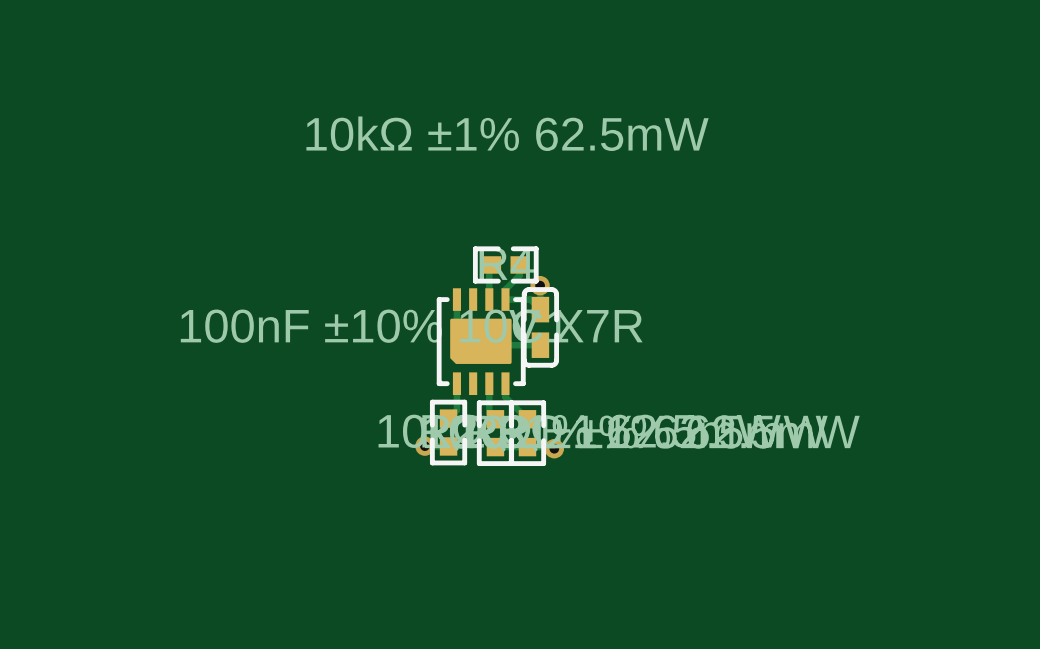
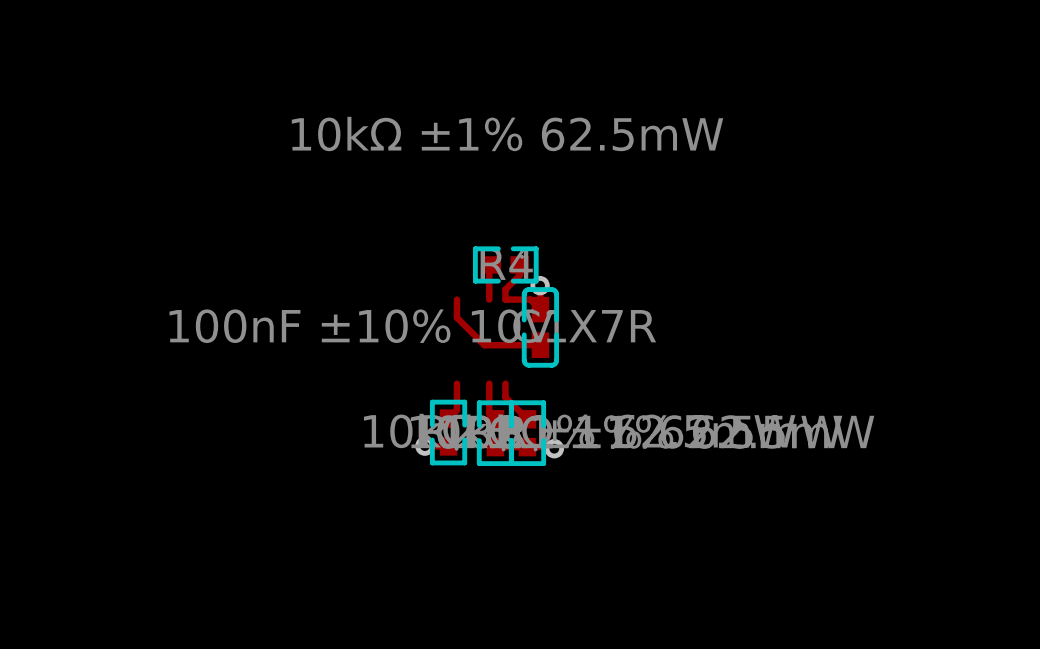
part: (480, 342) -> none

